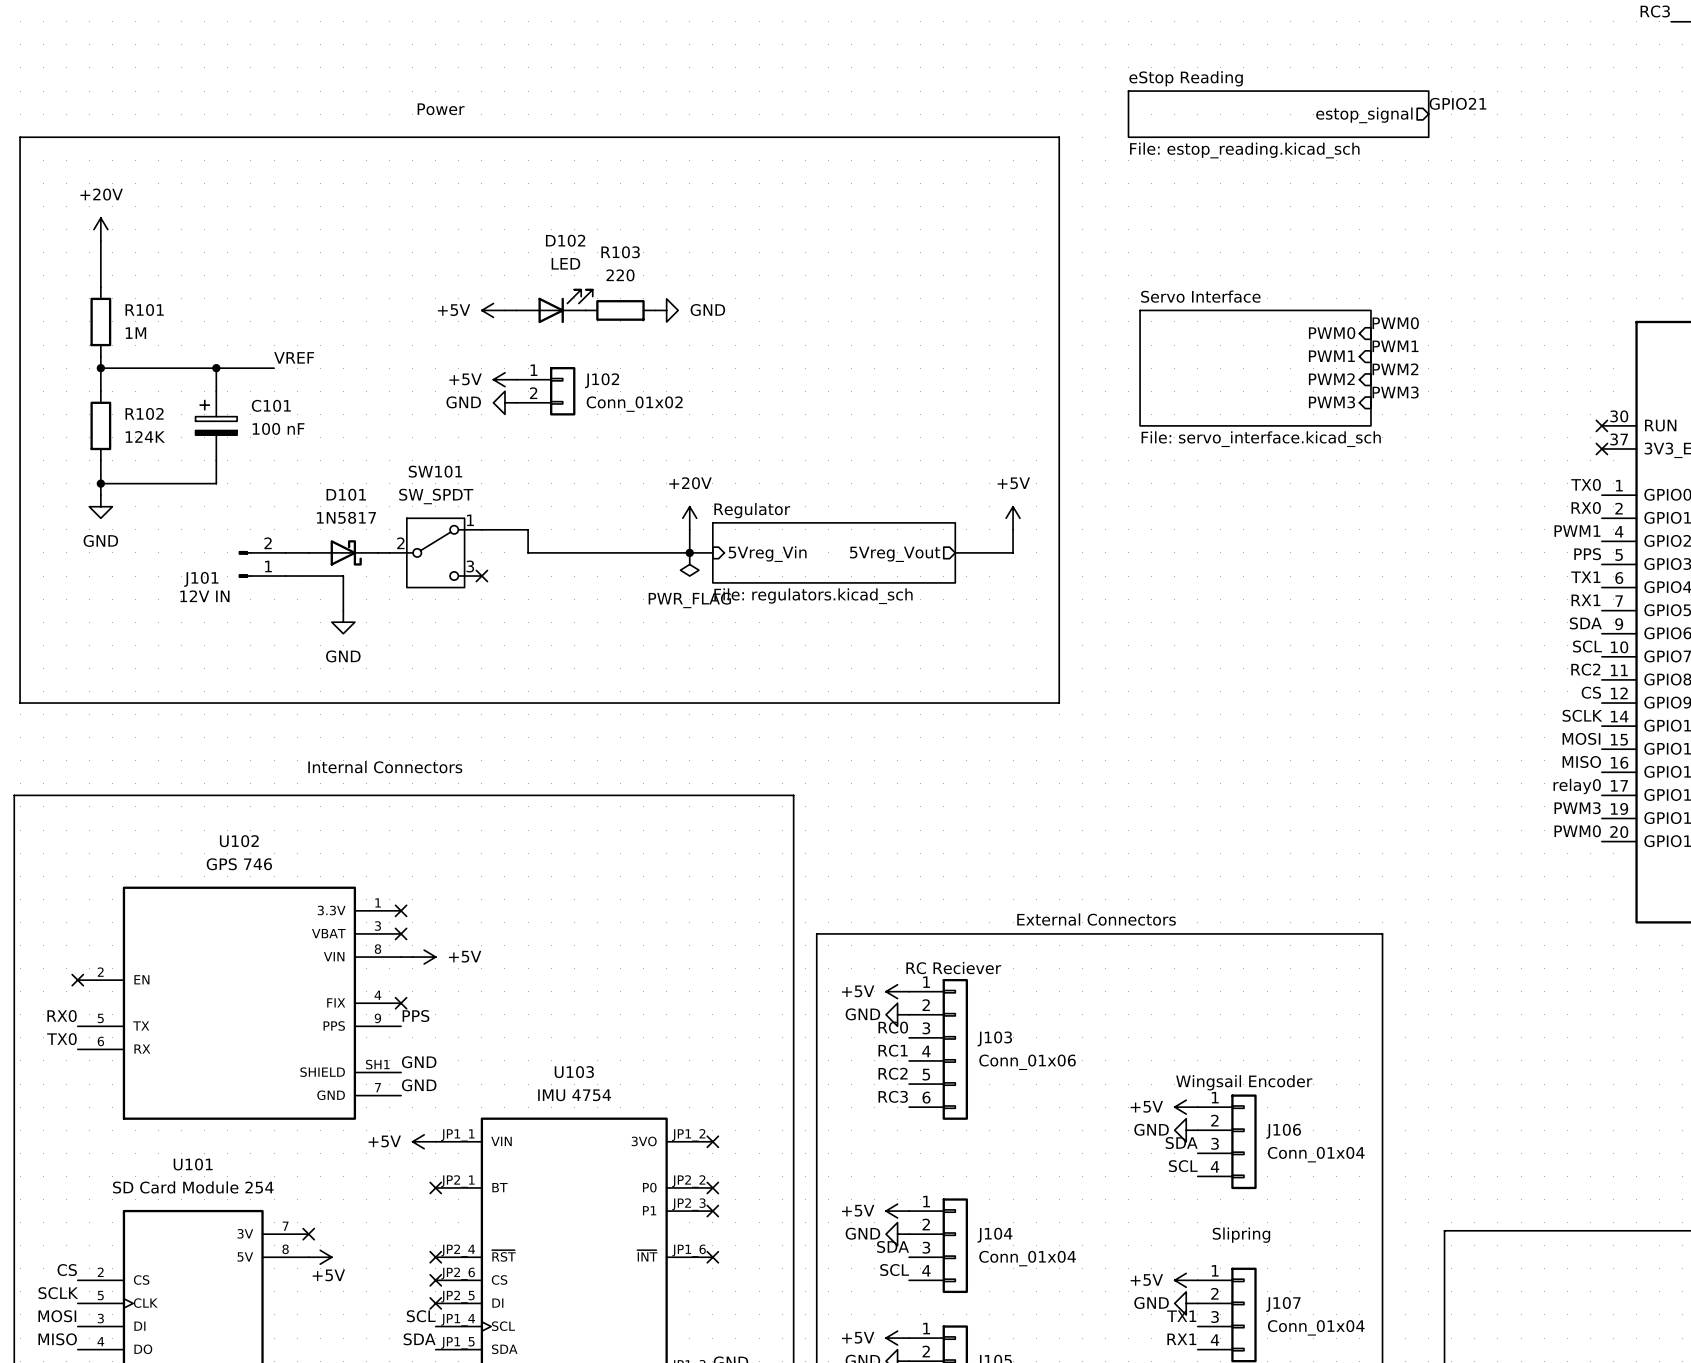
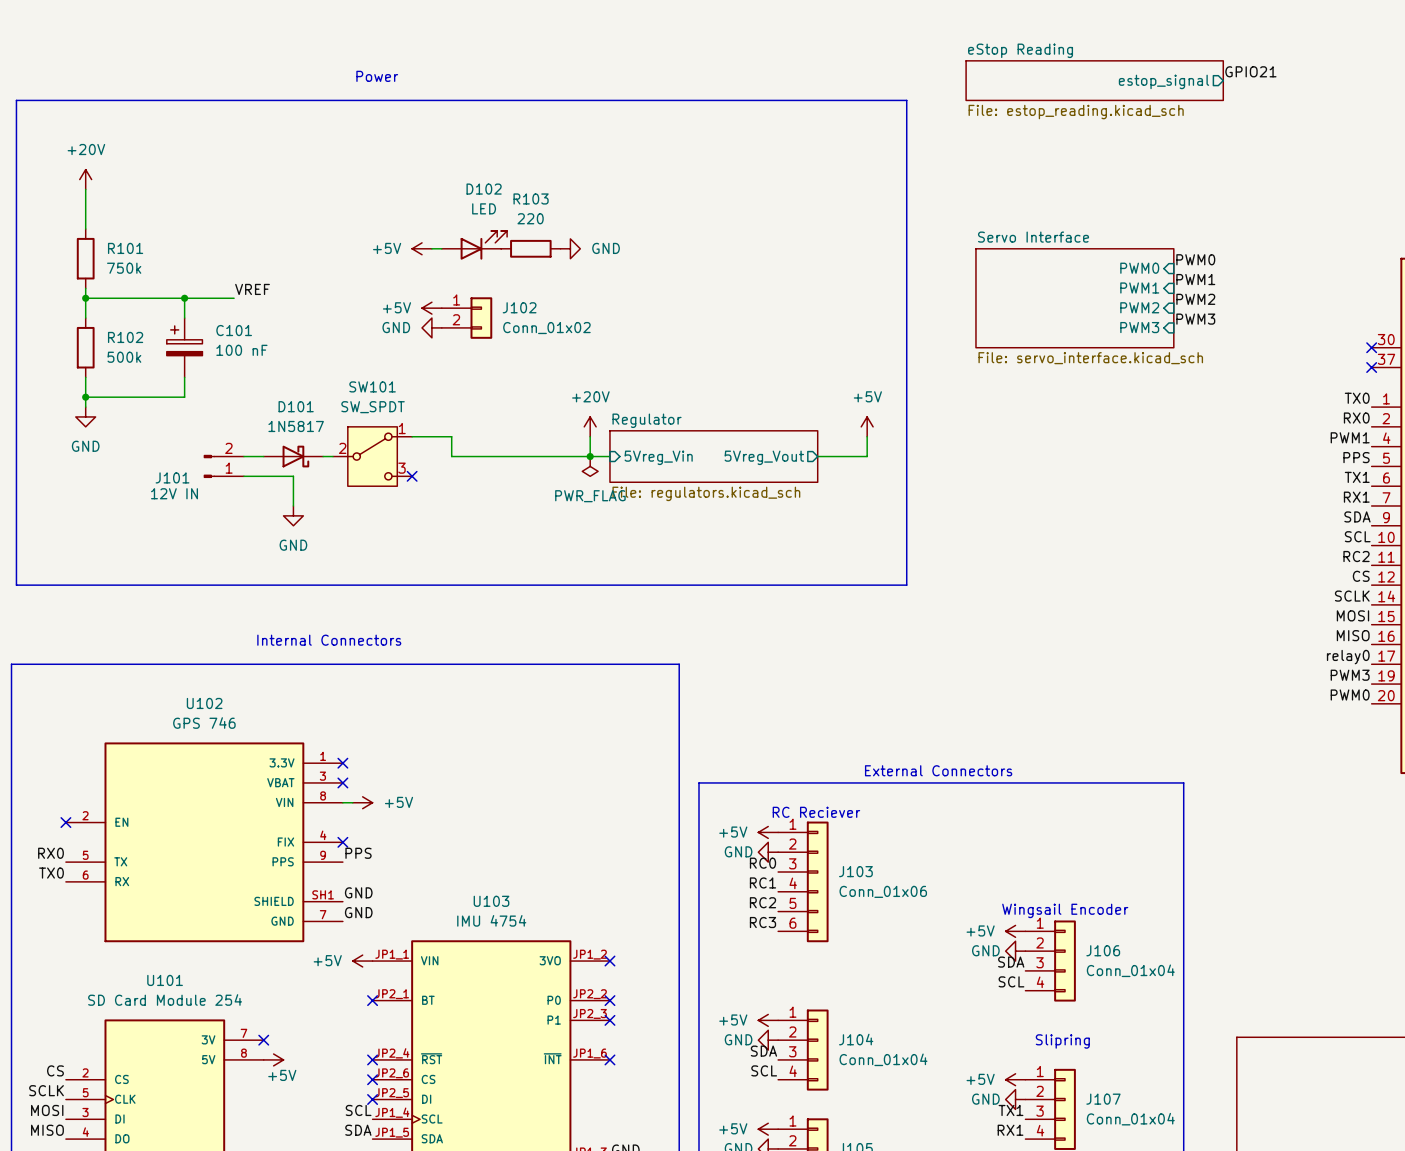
R101 value: 1M (135, 333) -> 750k (124, 268)
R102 value: 124K (145, 436) -> 500k (124, 357)

